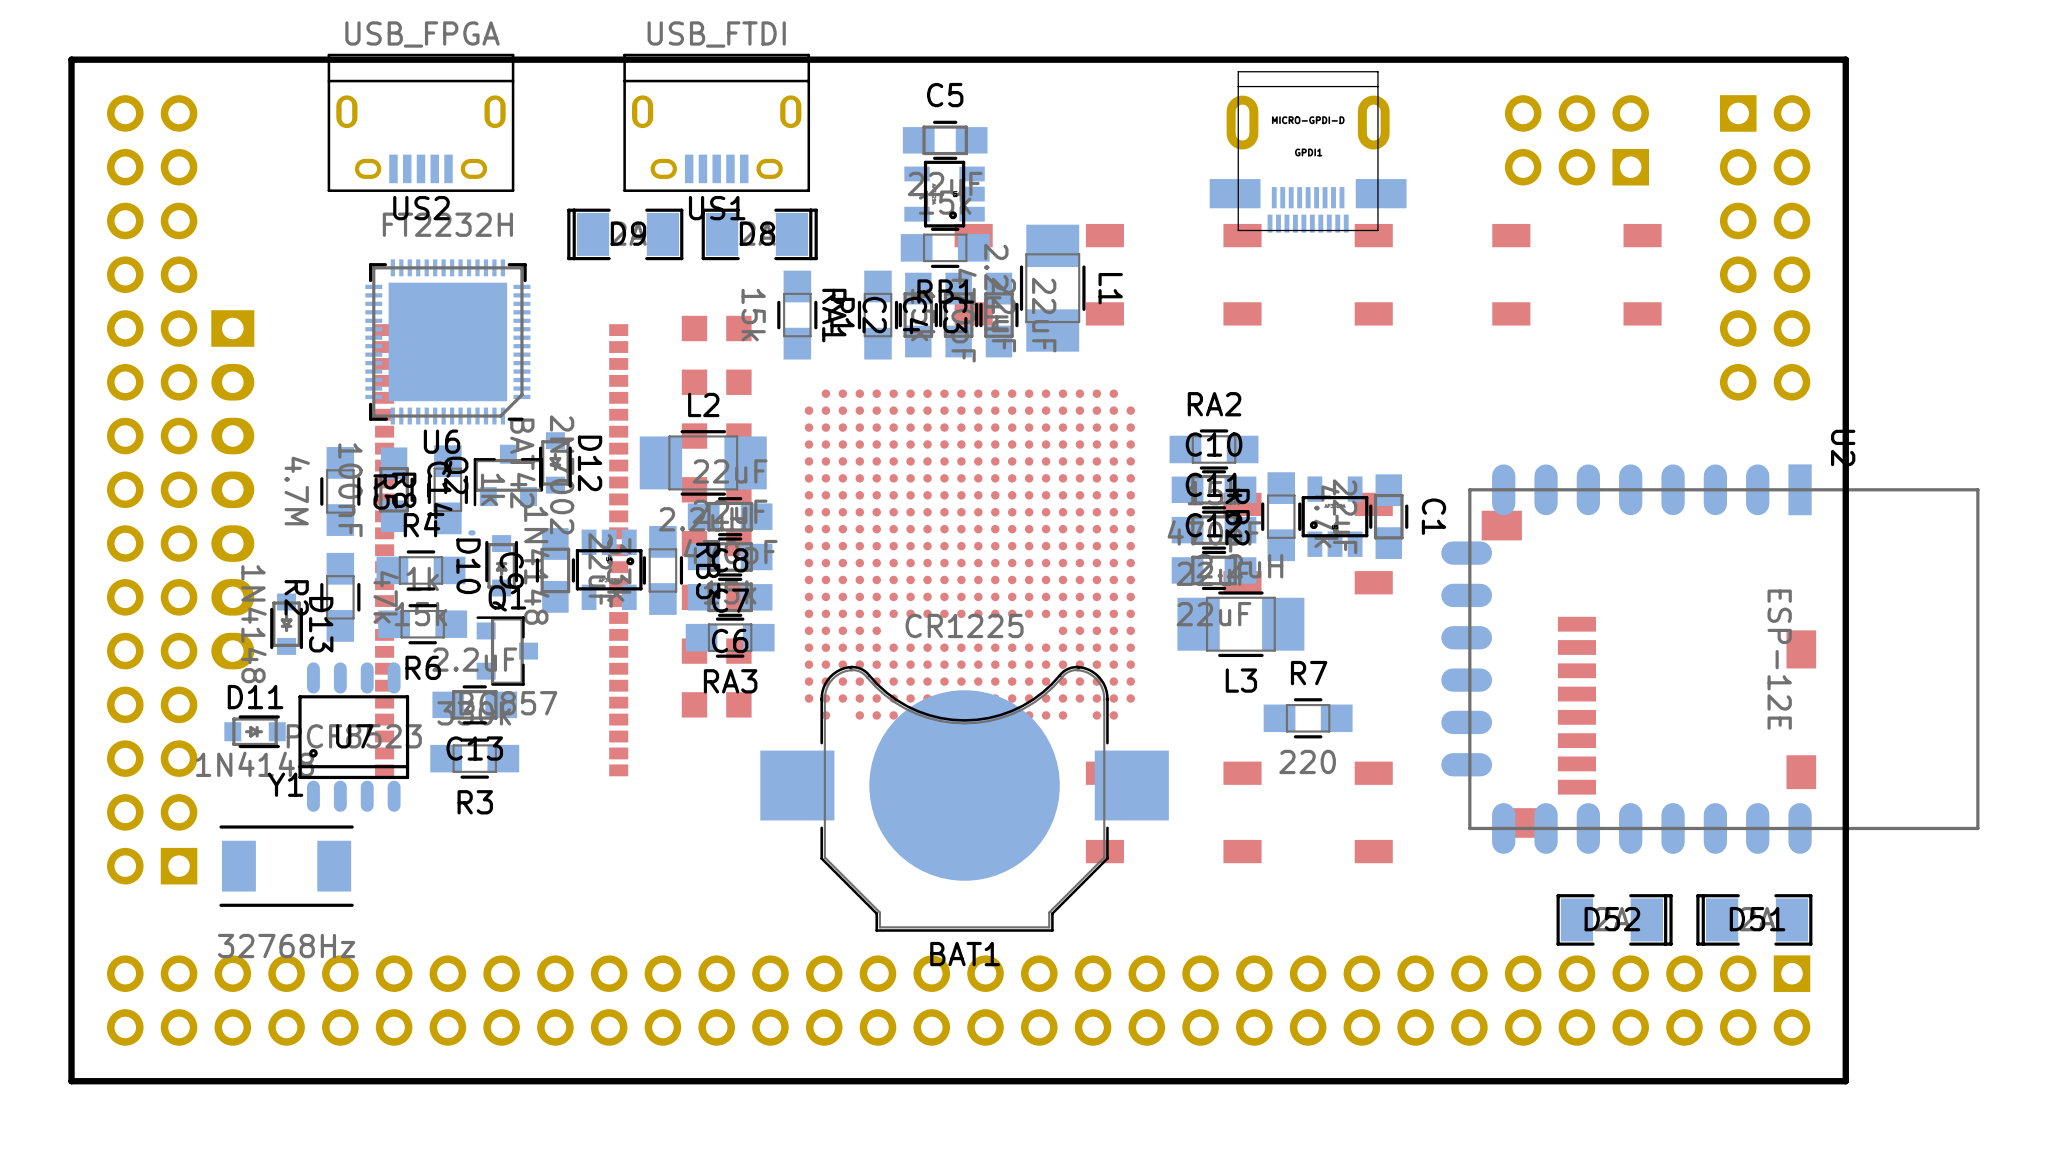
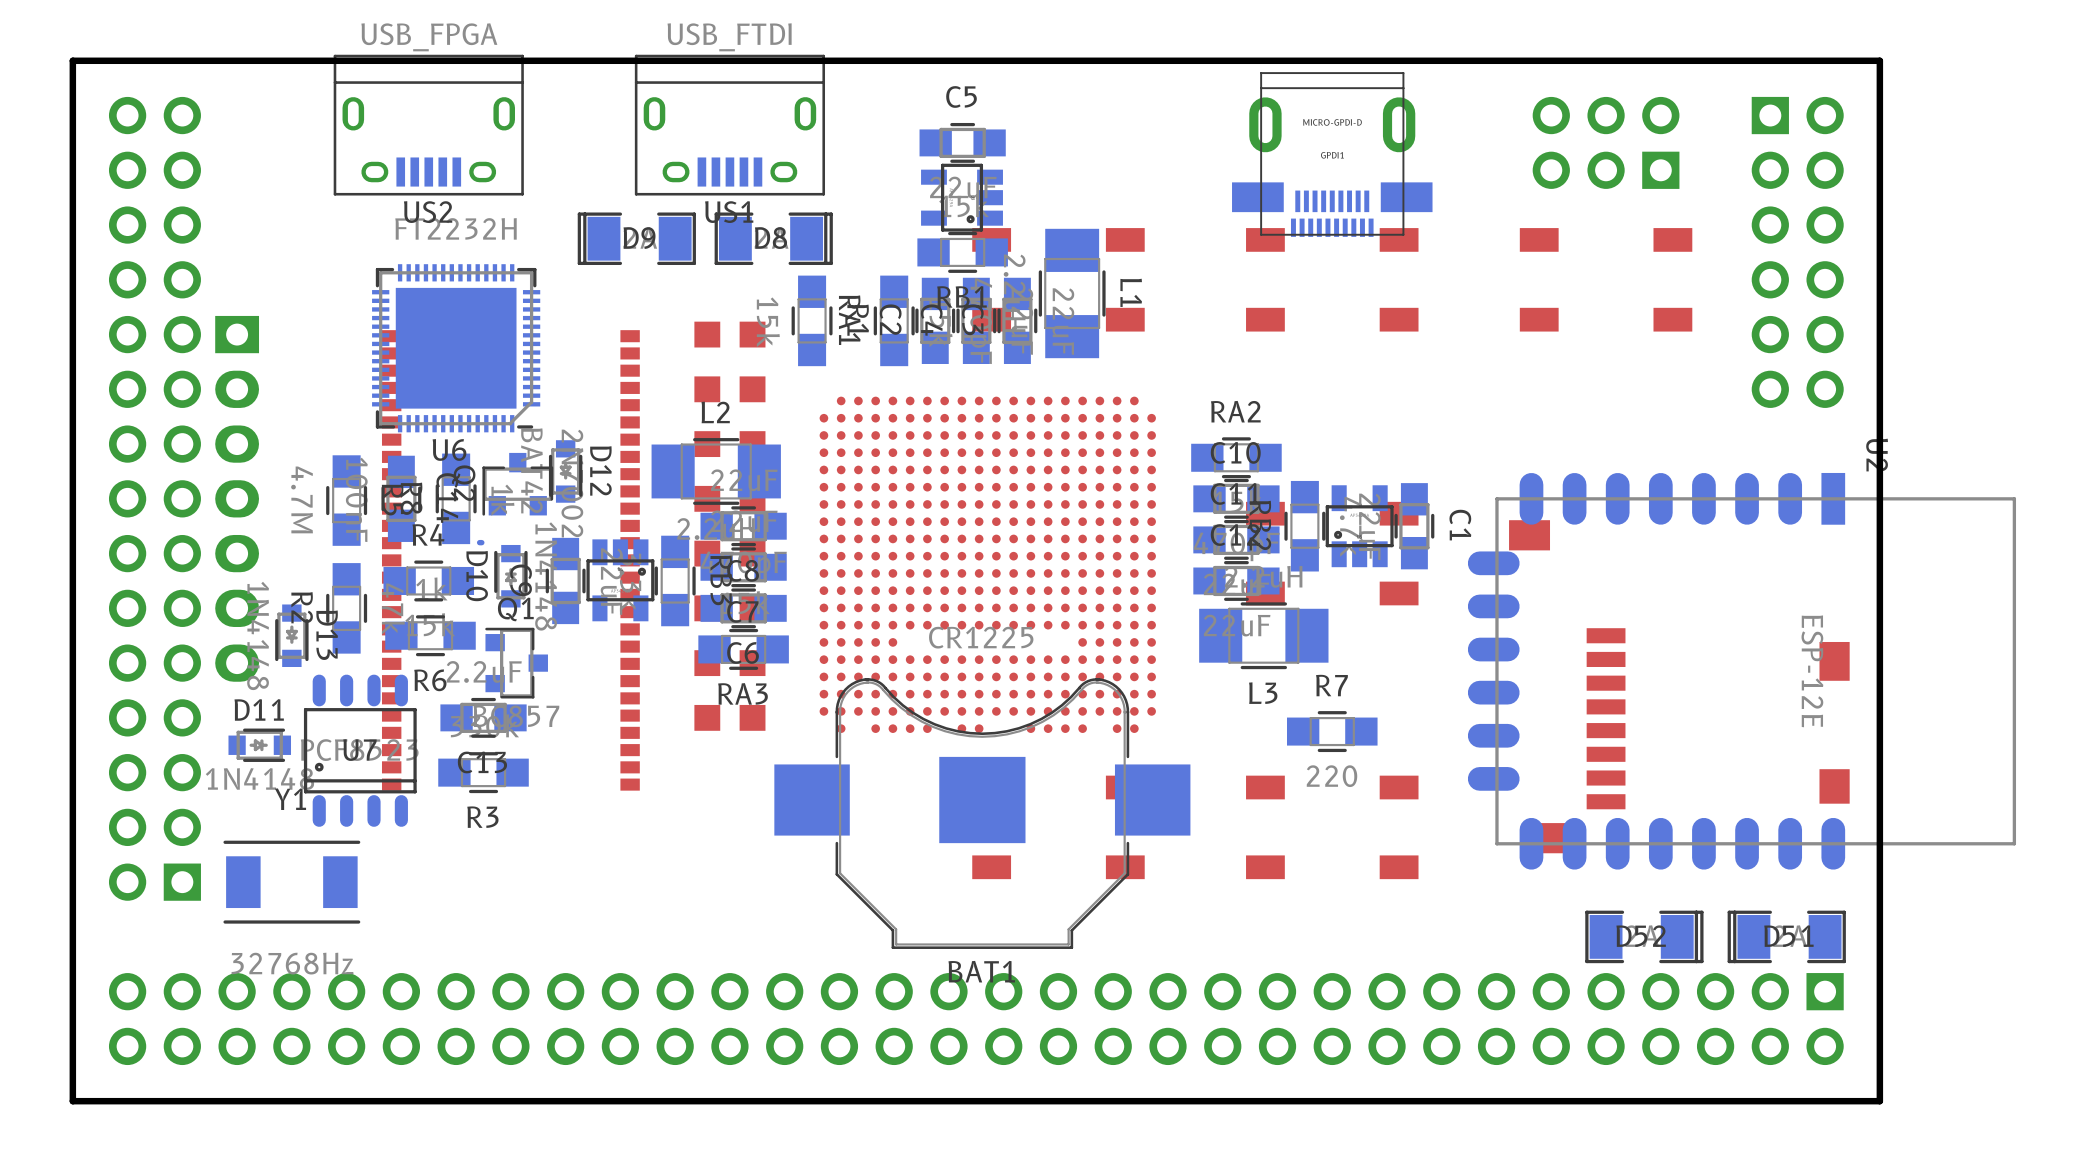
BAT1 footprint: [760, 665, 1169, 932] -> [774, 677, 1191, 949]

